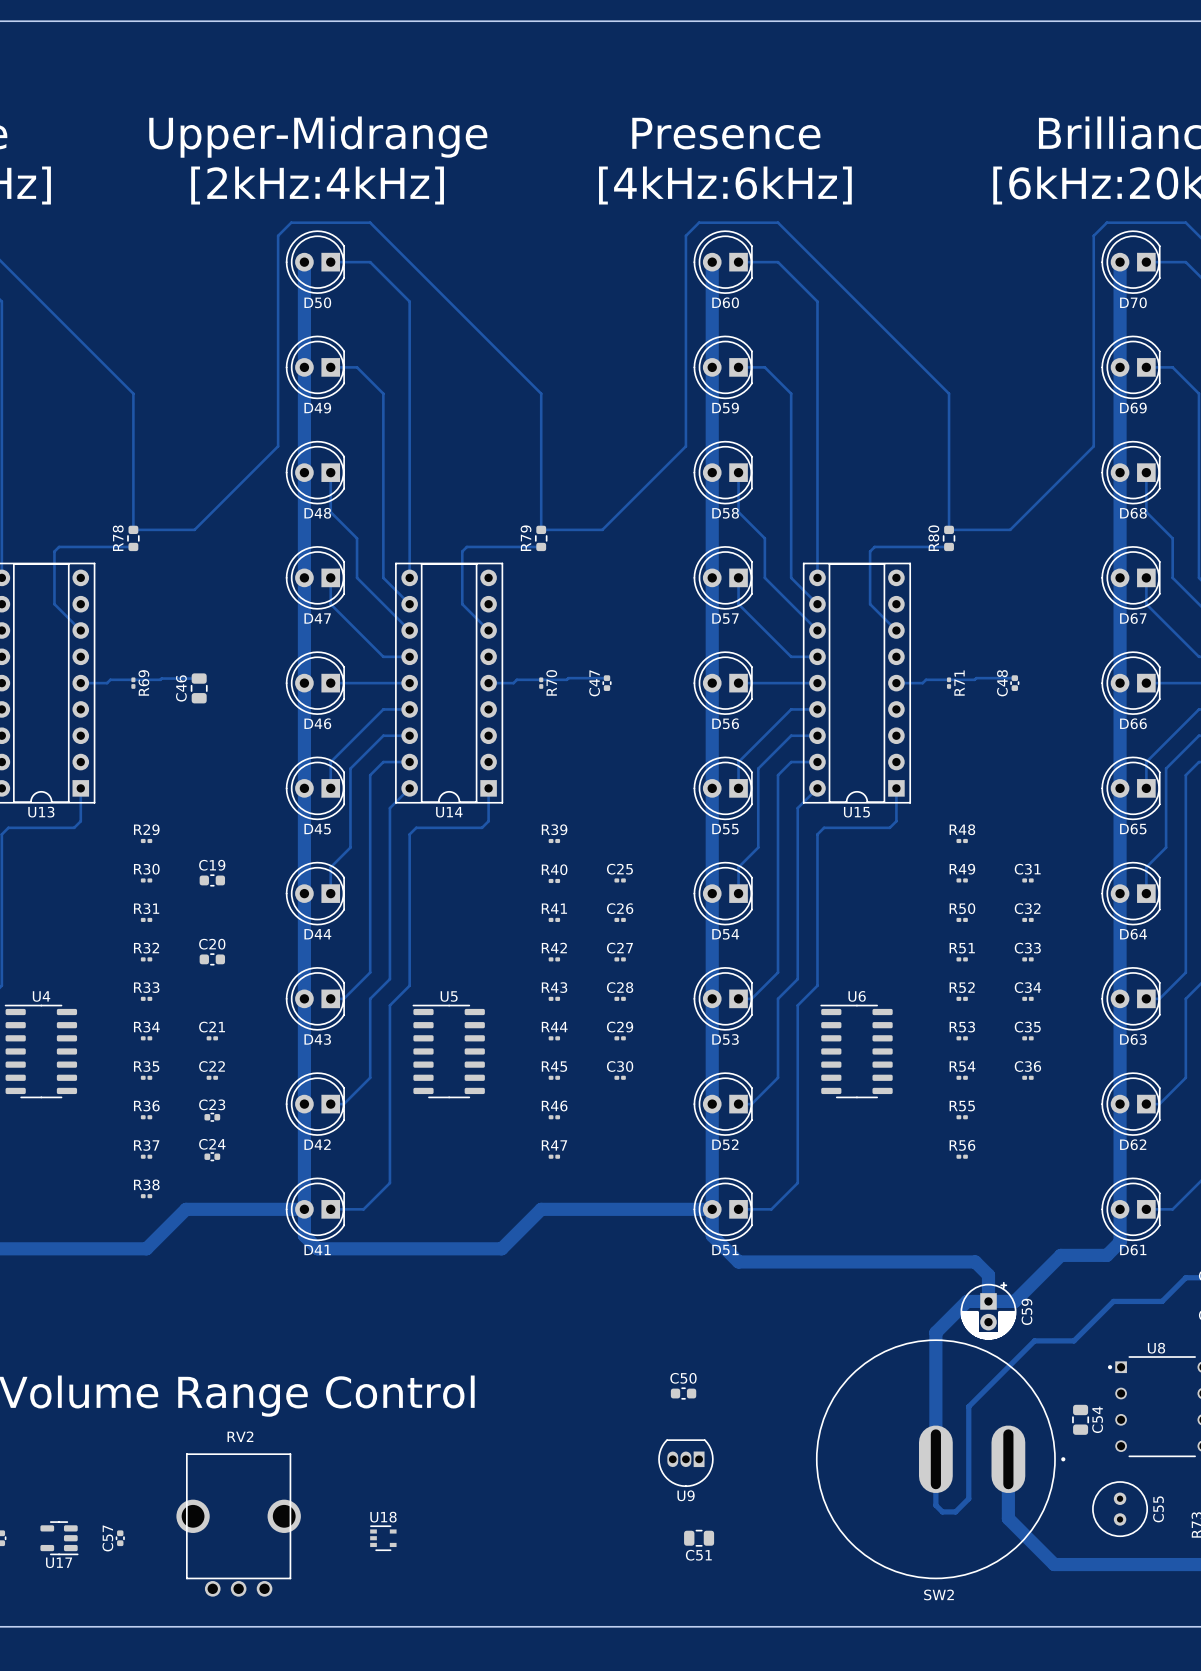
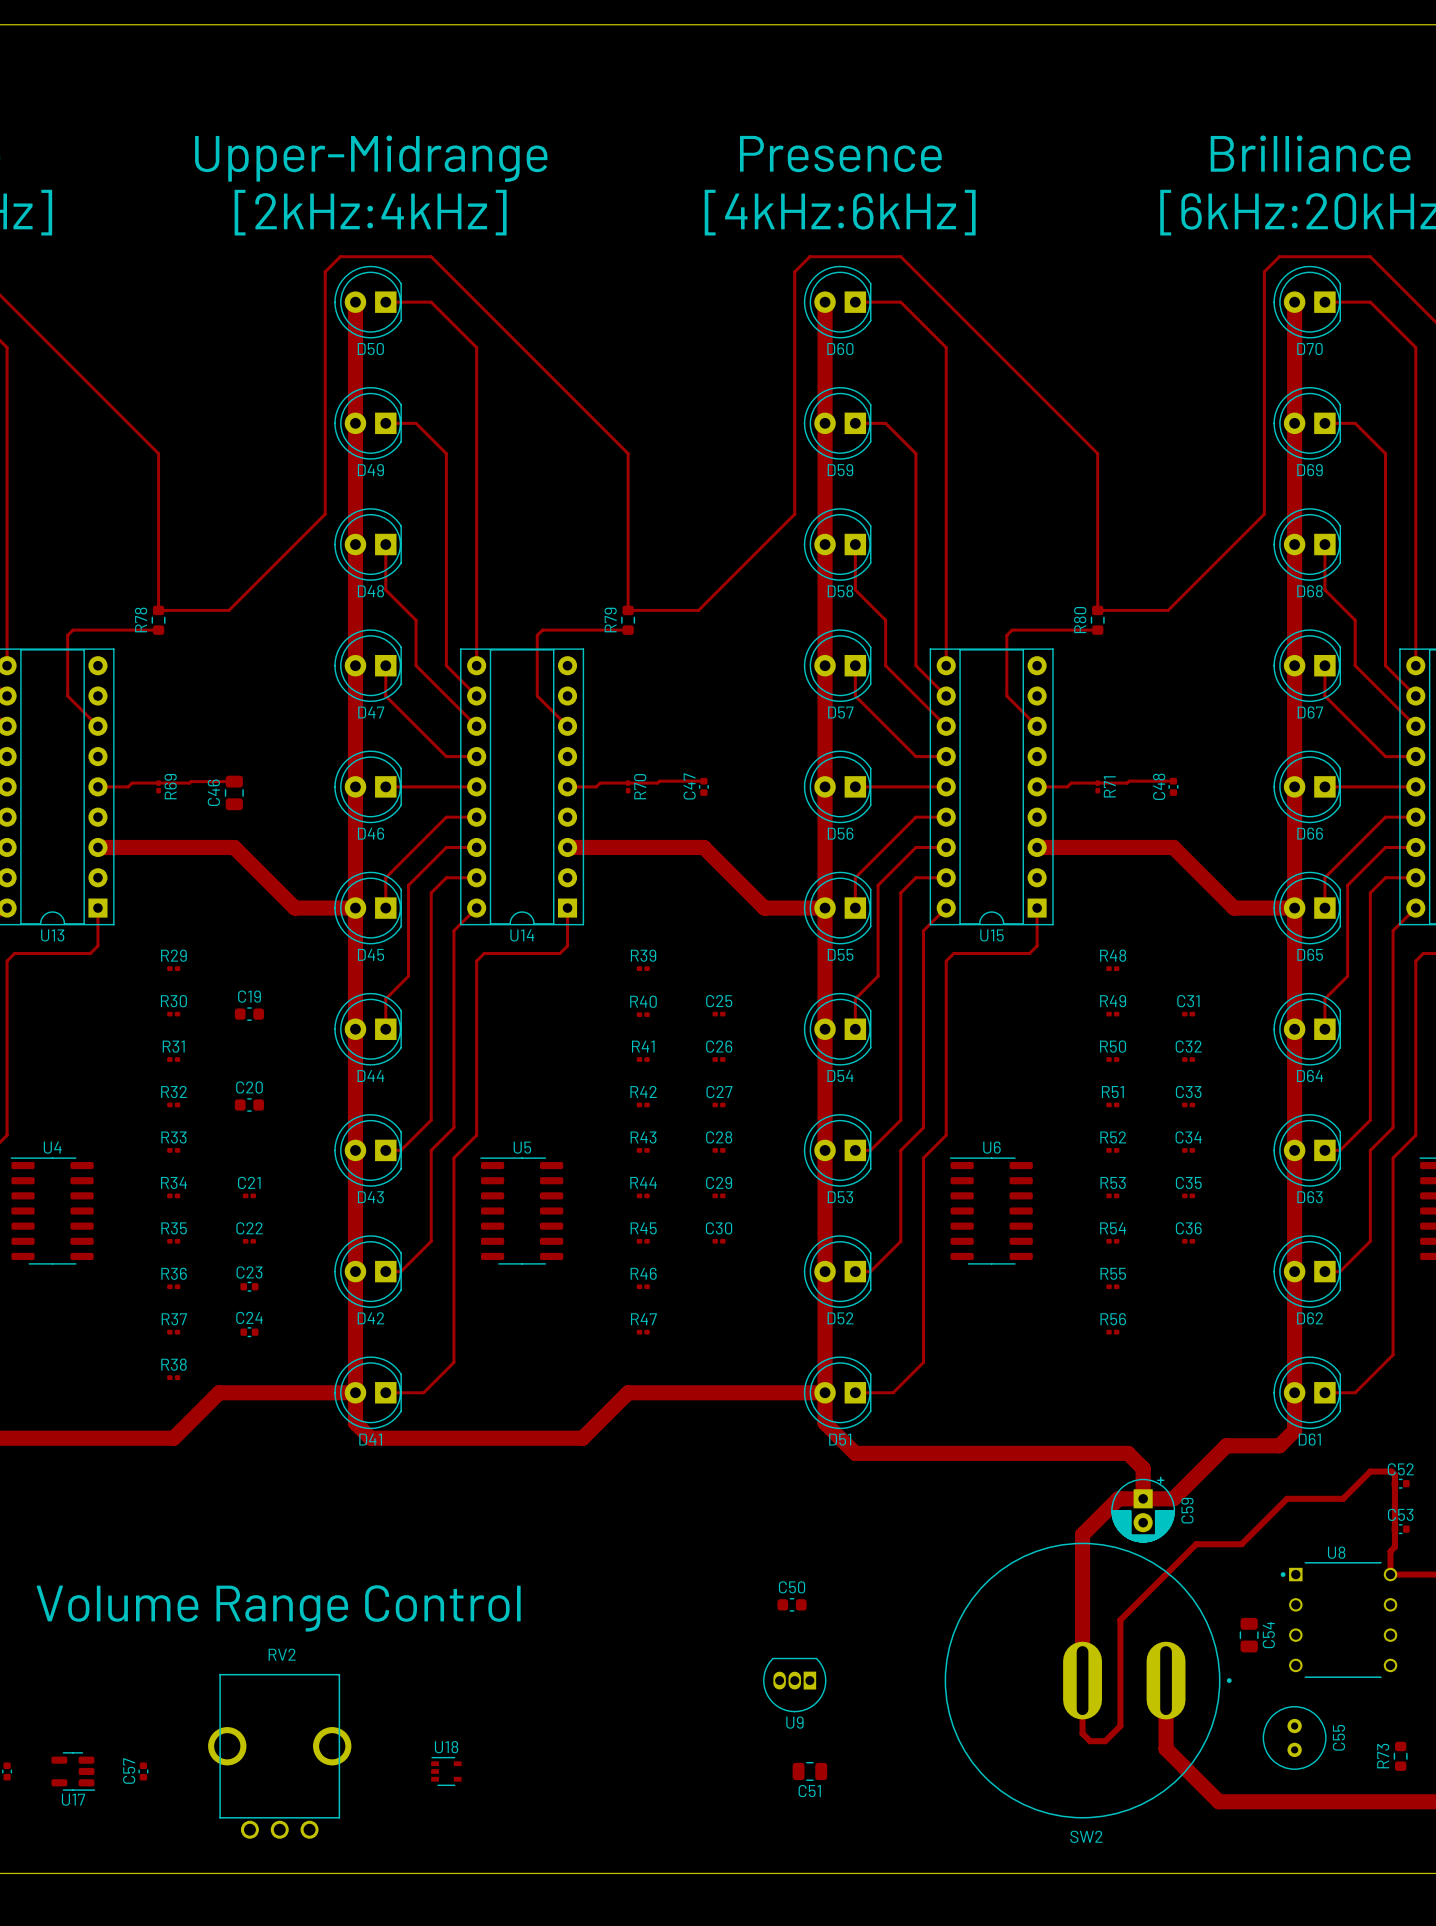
track: none -> (97, 847) (234, 847) (294, 908) (355, 908)
track: none -> (567, 847) (703, 847) (764, 908) (825, 908)
track: none -> (1037, 847) (1173, 847) (1234, 908) (1294, 908)

